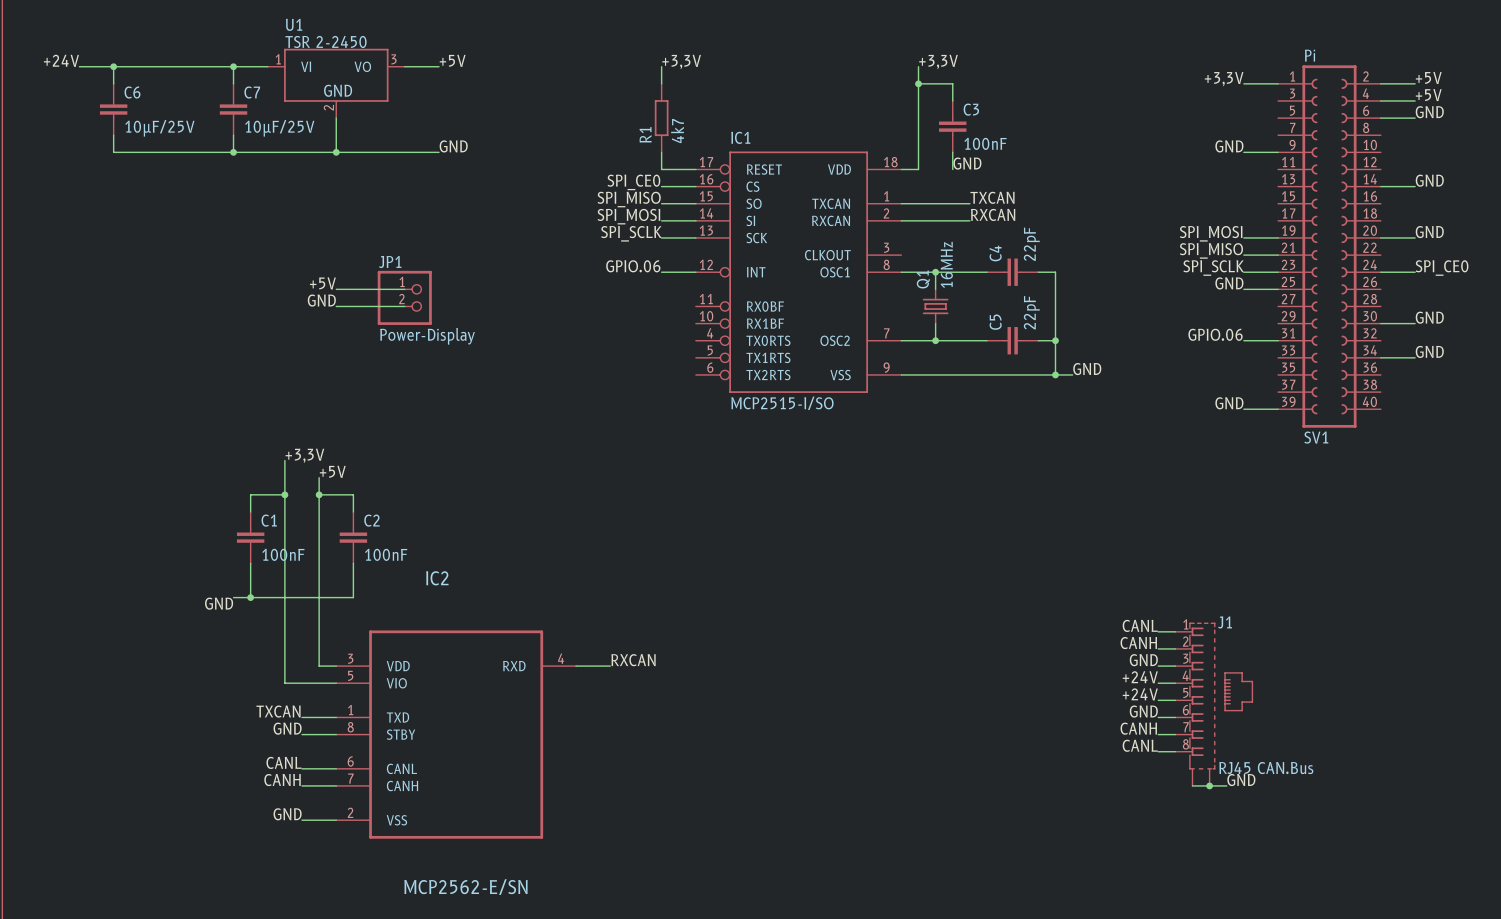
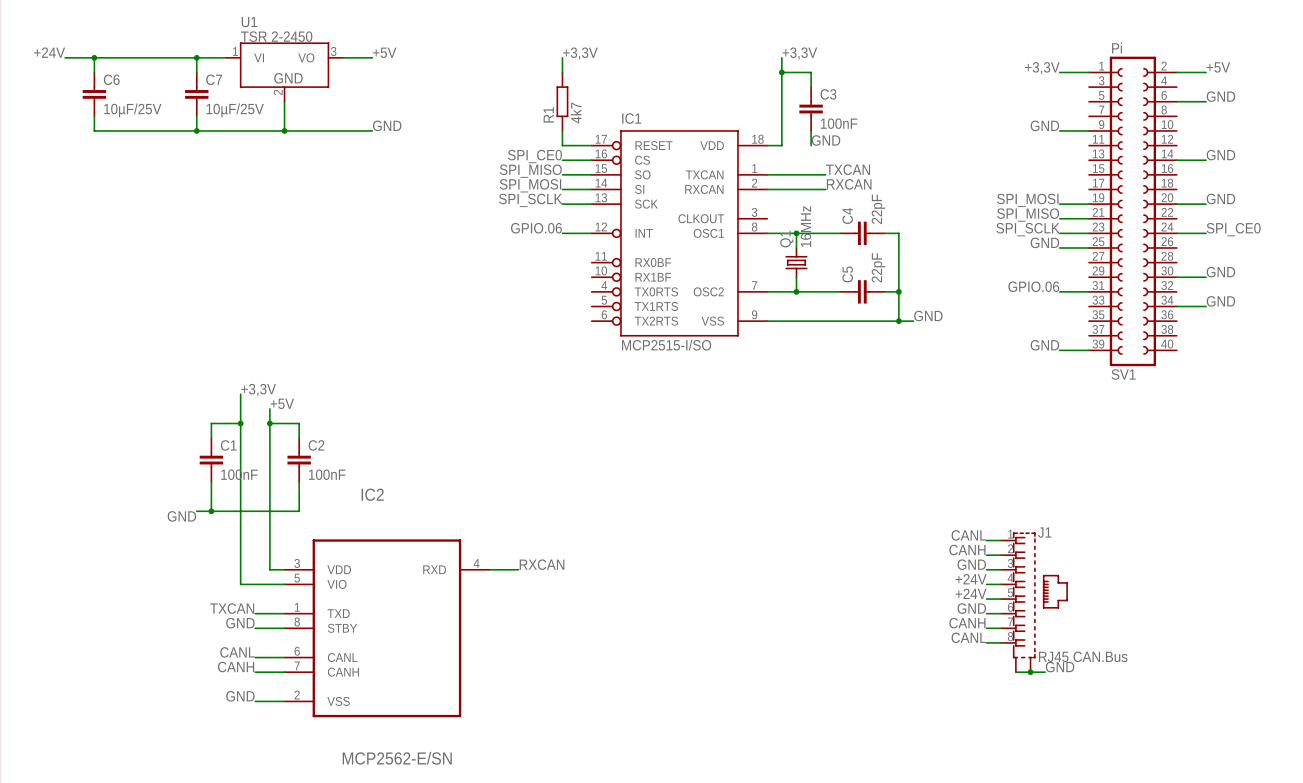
label: +5V (1428, 95) -> none
wire: (1380, 100) (1415, 100) -> none
label: +5V (322, 283) -> none
wire: (336, 289) (404, 289) -> none
JP1: Power-Display (404, 297) -> none
label: GND (321, 300) -> none
wire: (336, 306) (404, 306) -> none

